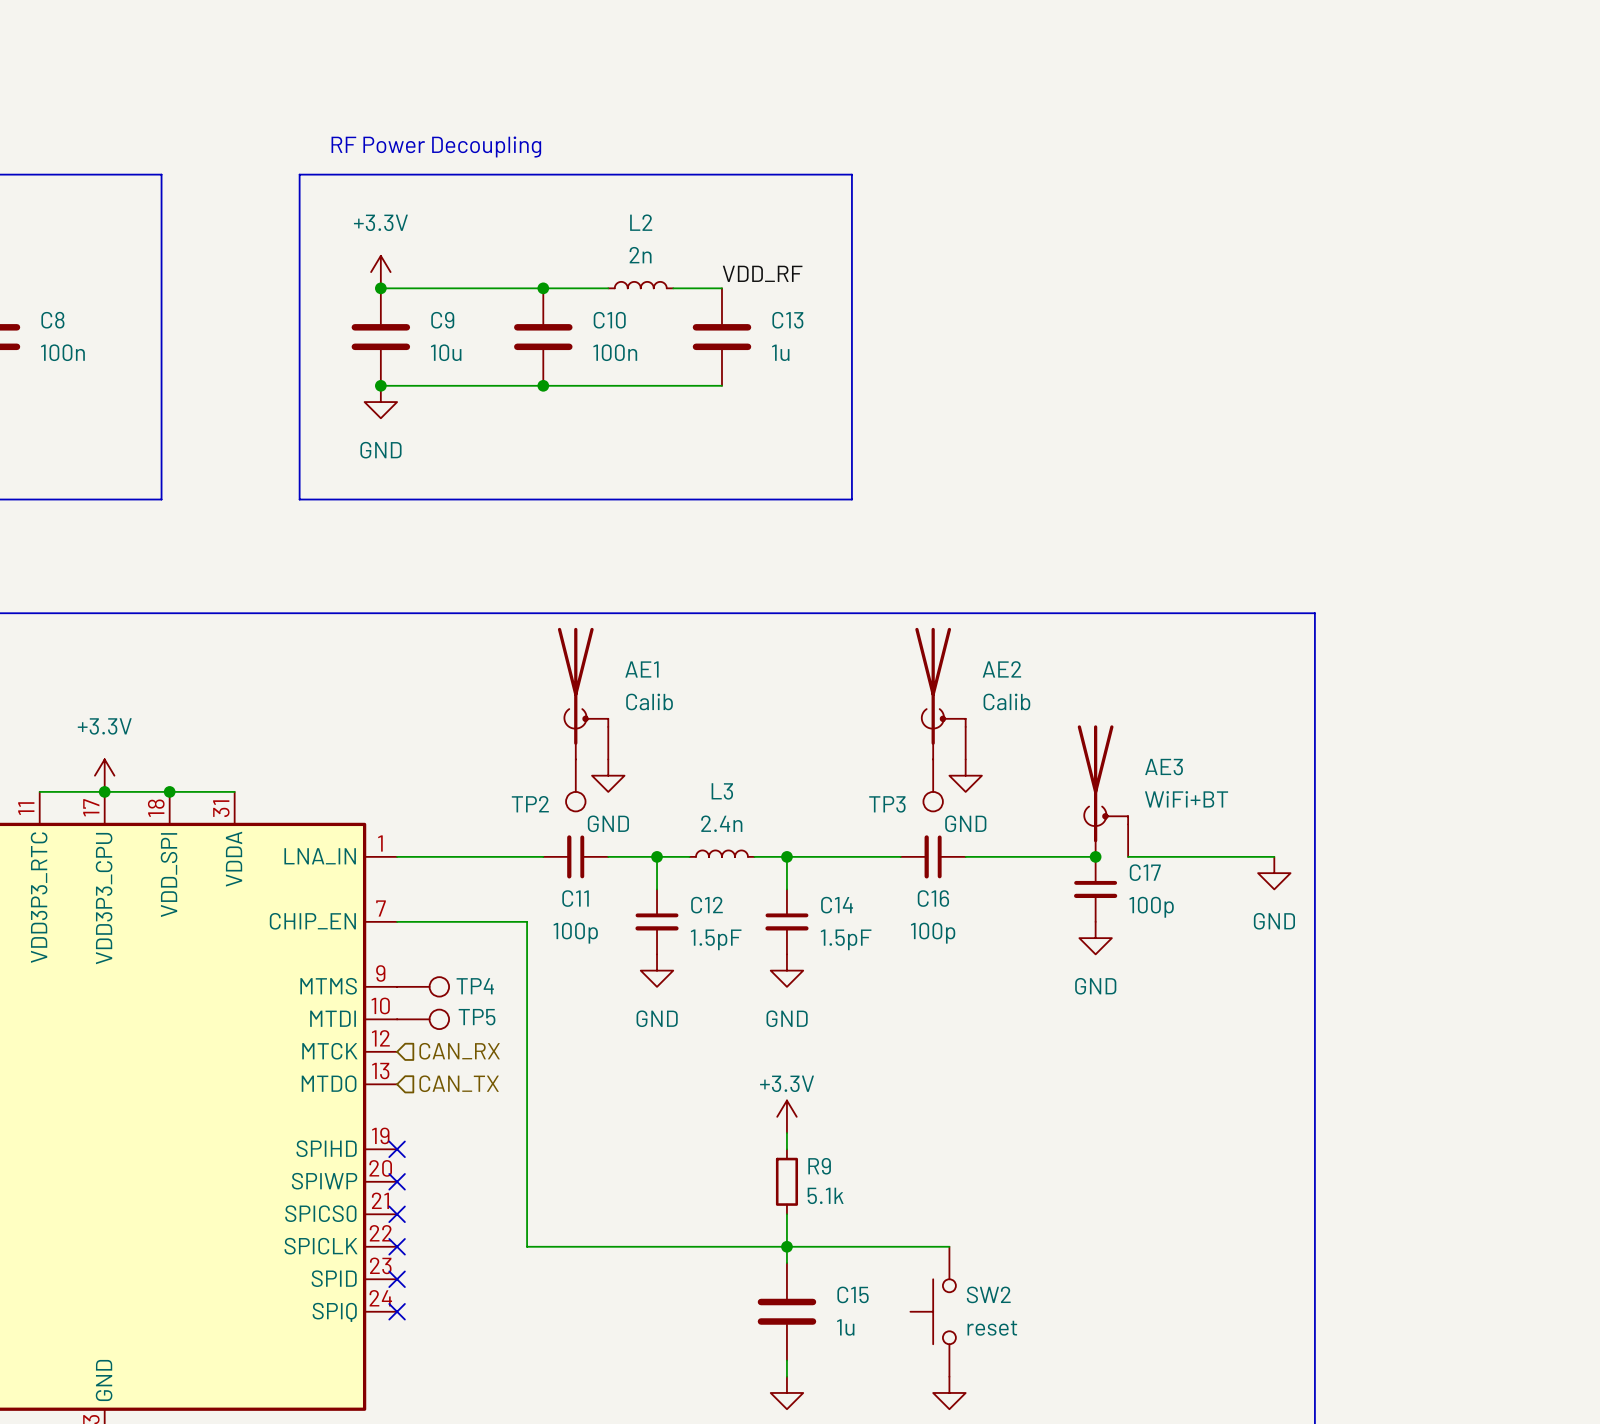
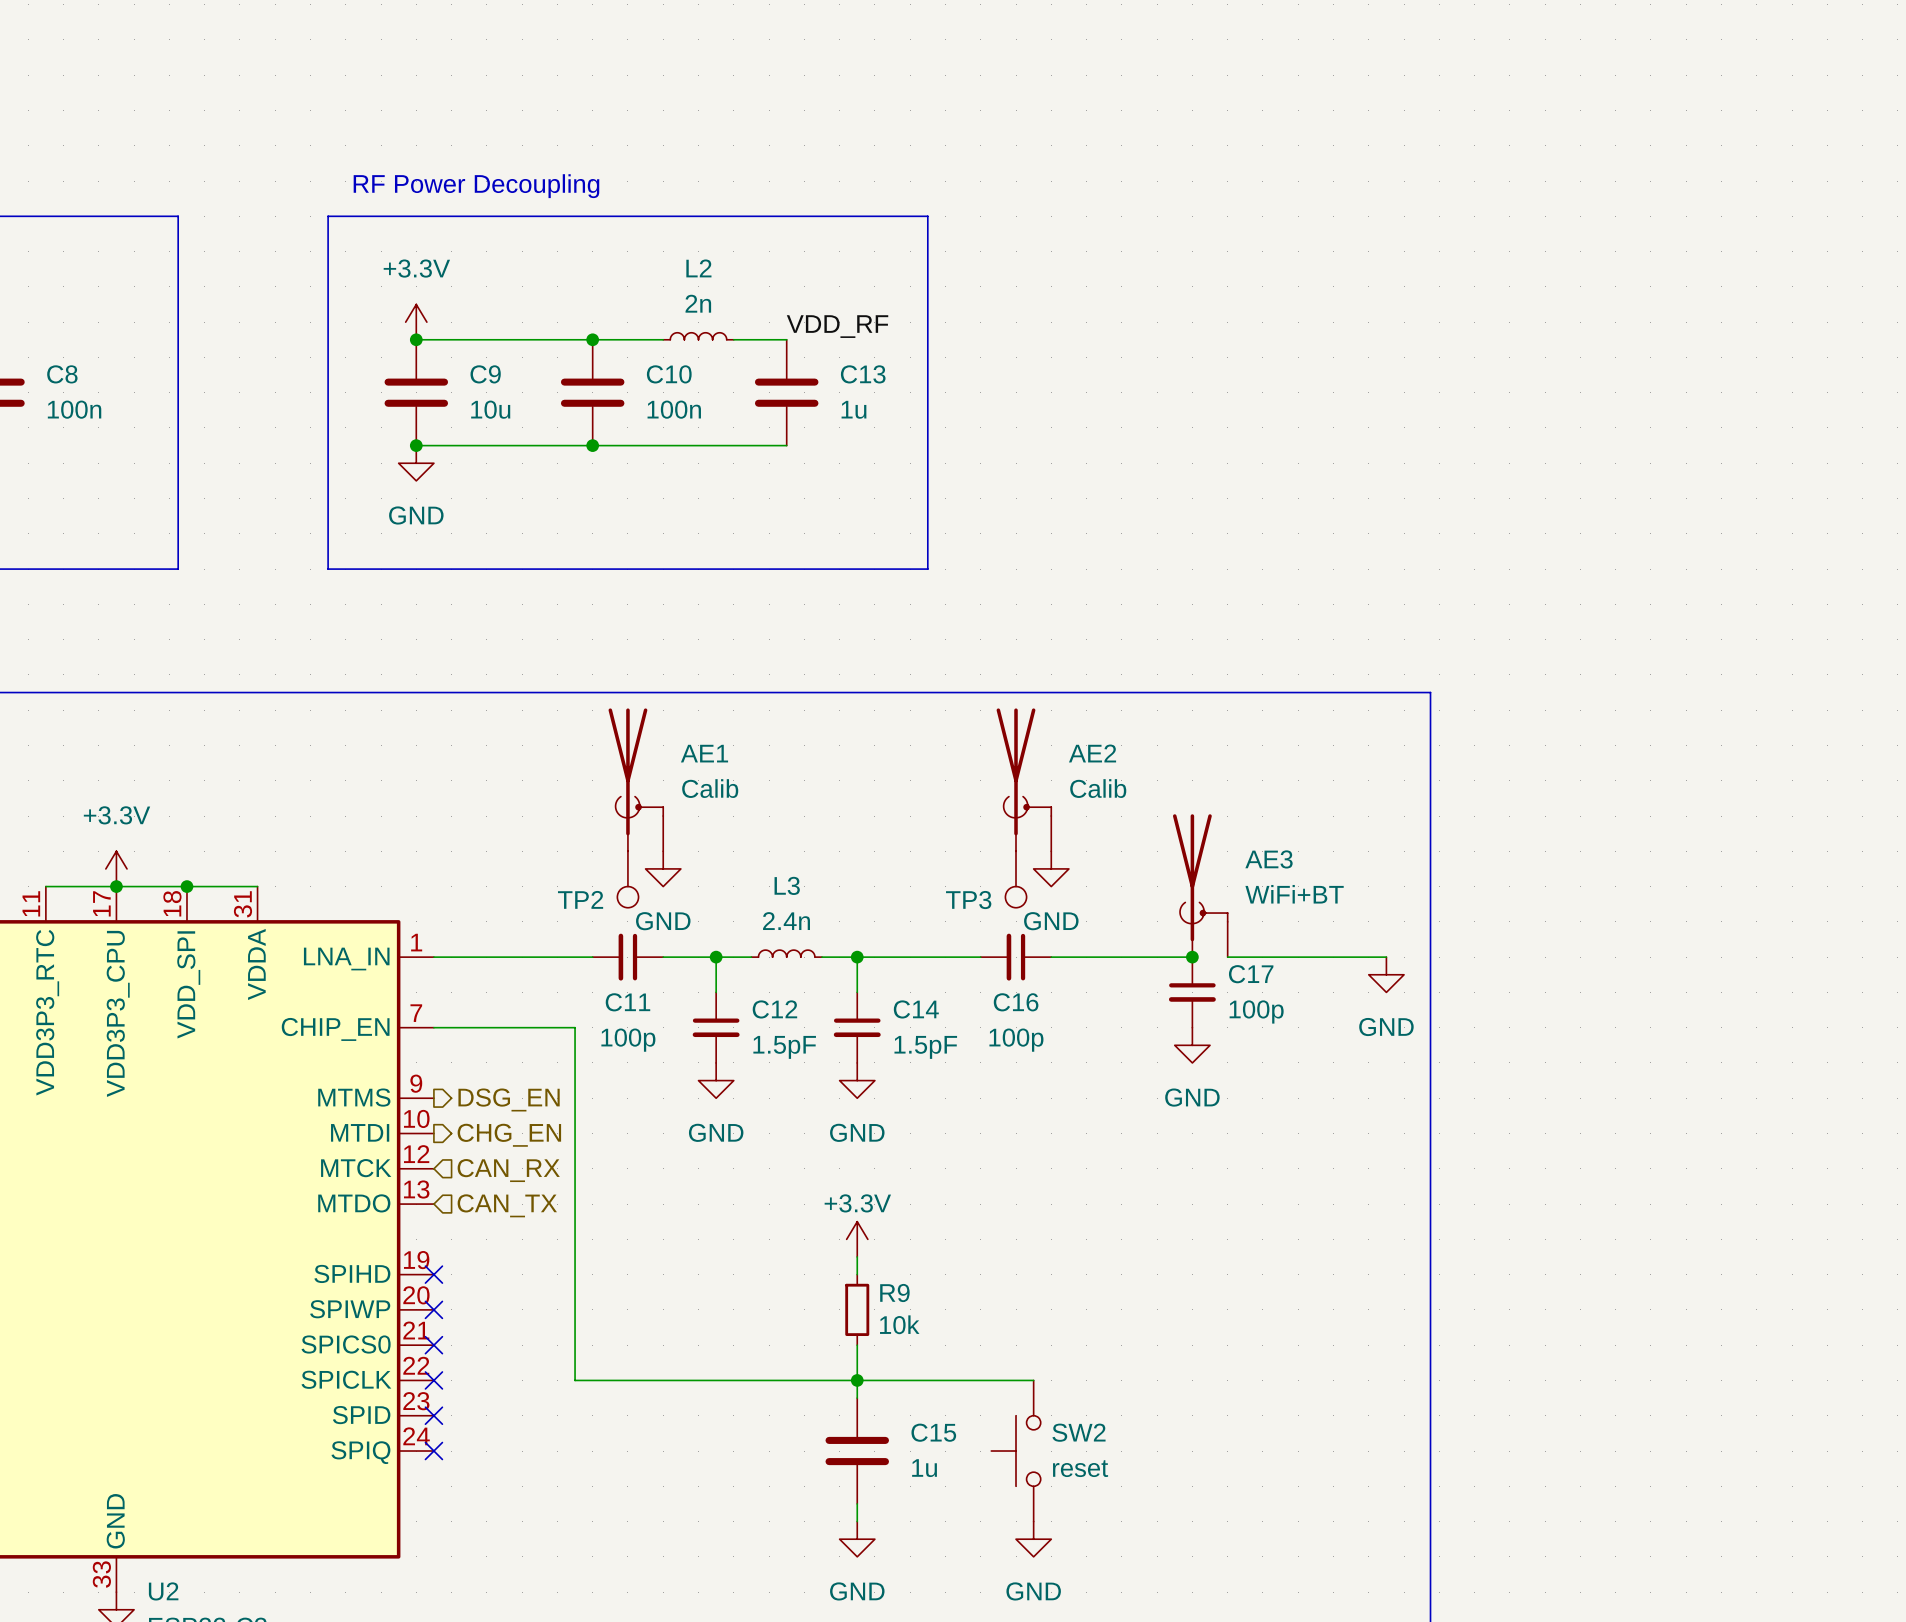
TP4: (423, 986) -> none
hierarchical label: none -> DSG_EN (509, 1099)
hierarchical label: none -> CHG_EN (509, 1135)
TP5: (423, 1019) -> none
R9 value: 5.1k (825, 1195) -> 10k (899, 1324)

